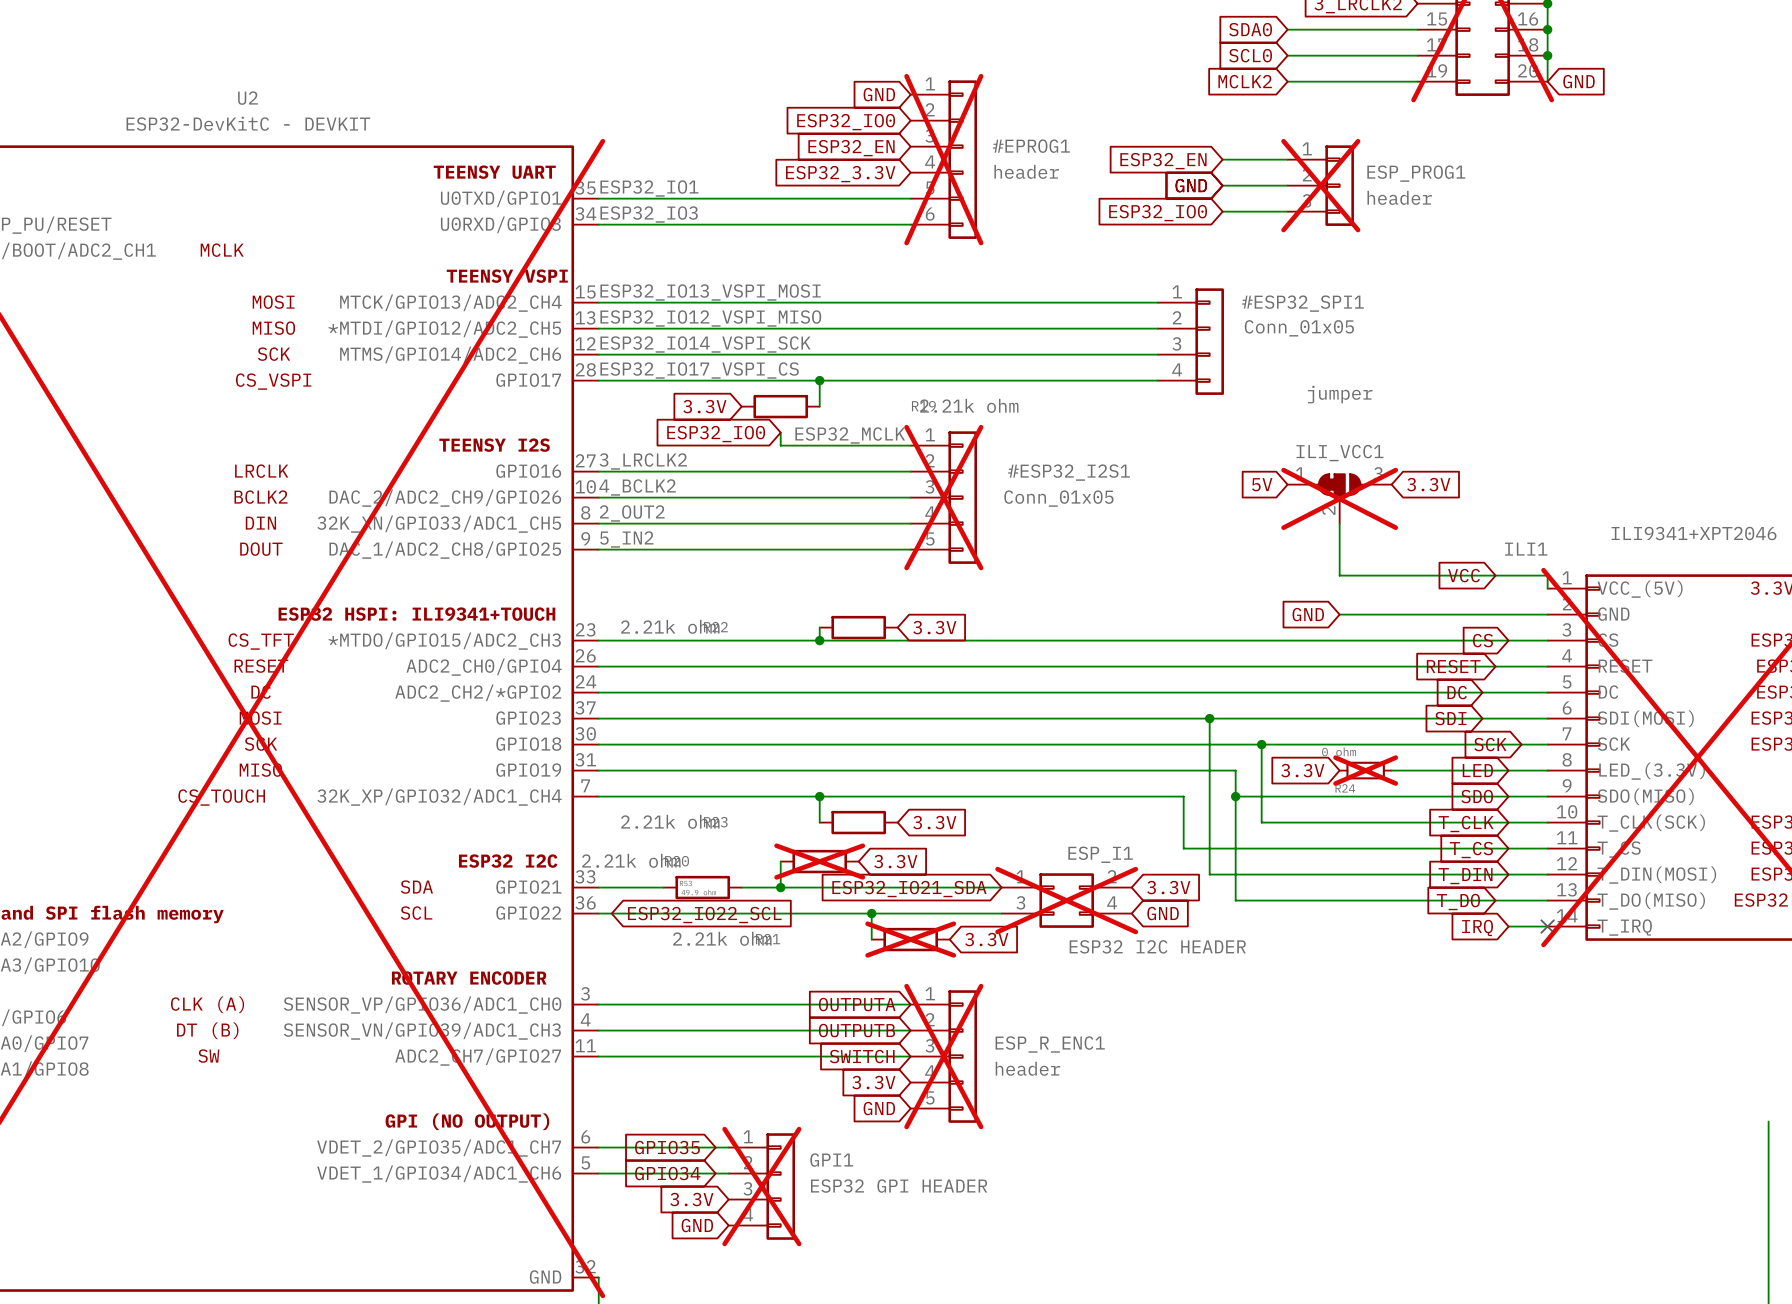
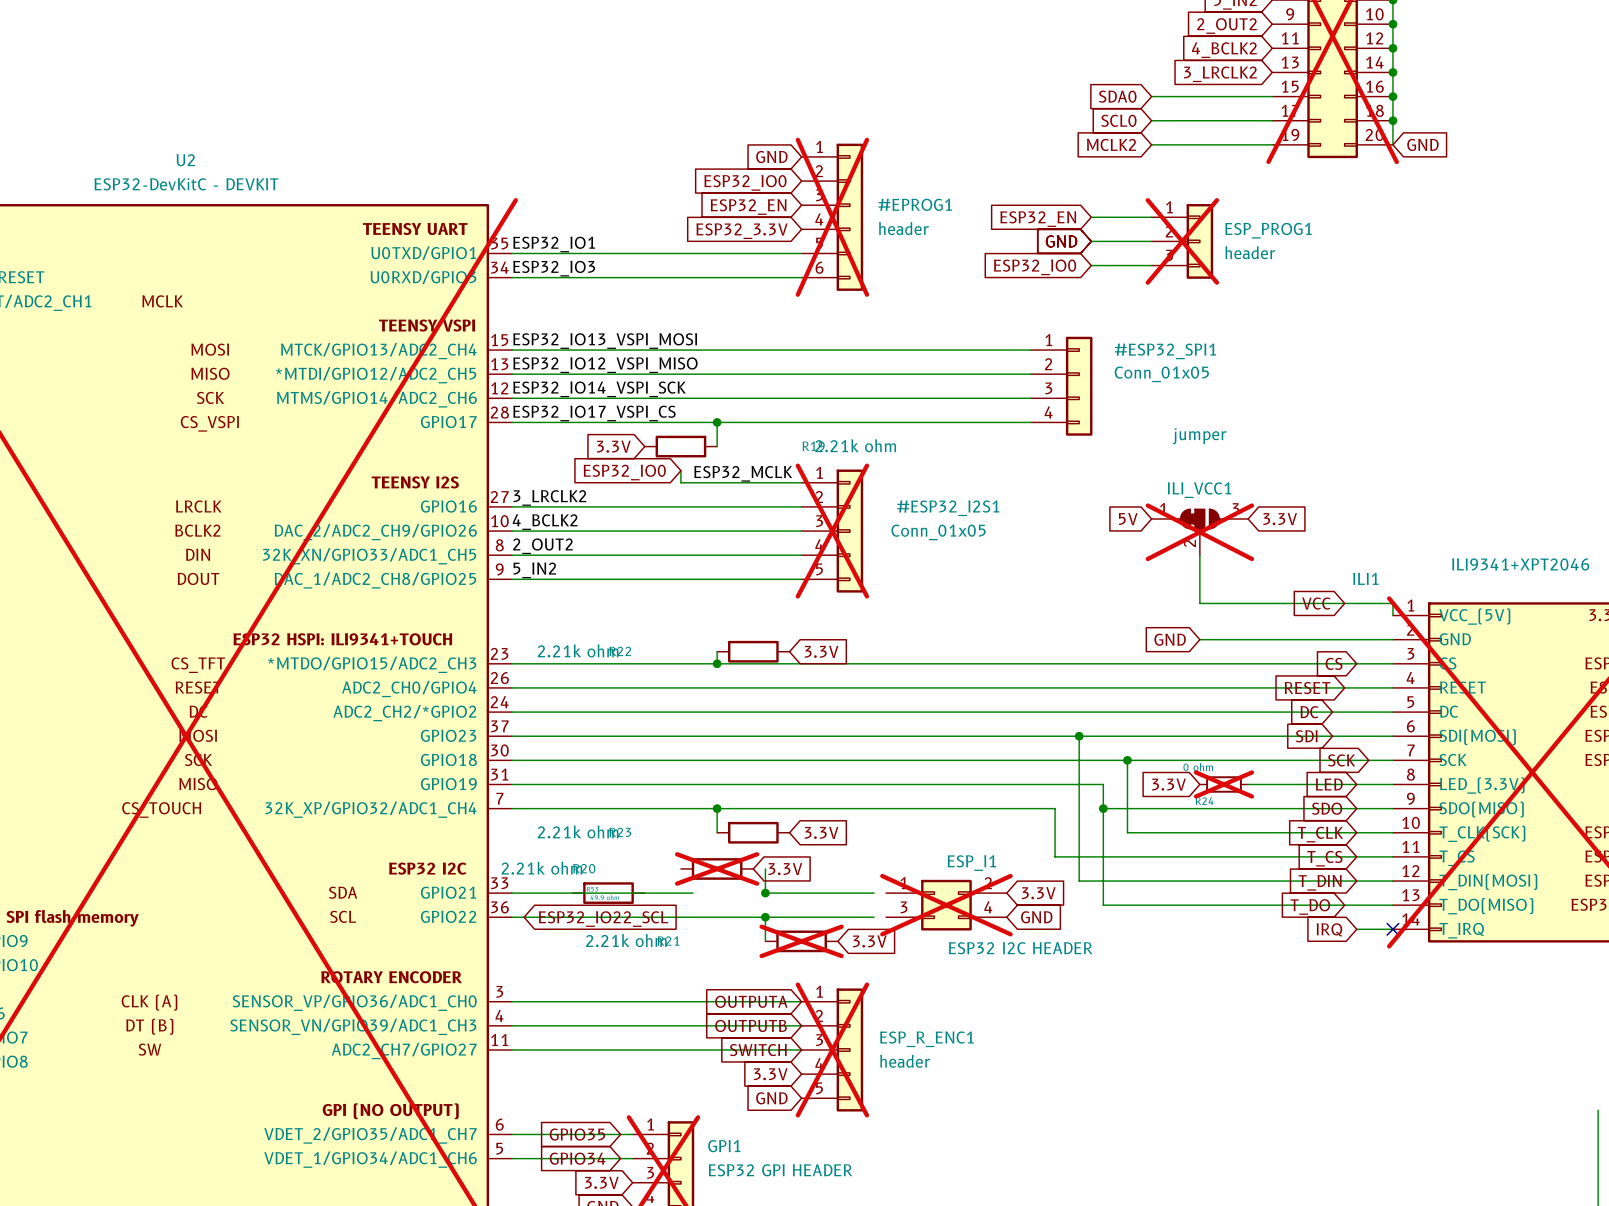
wire: (780, 861) (780, 887) -> none
wire: none -> (572, 893) (644, 893)
junction: (780, 887) -> none
wire: (793, 887) (871, 887) -> (765, 868) (765, 893)
junction: none -> (765, 893)
wire: (988, 887) (1001, 887) -> none
global label: ESP32_IO21_SDA (909, 889) -> none
wire: (988, 913) (1001, 913) -> none

